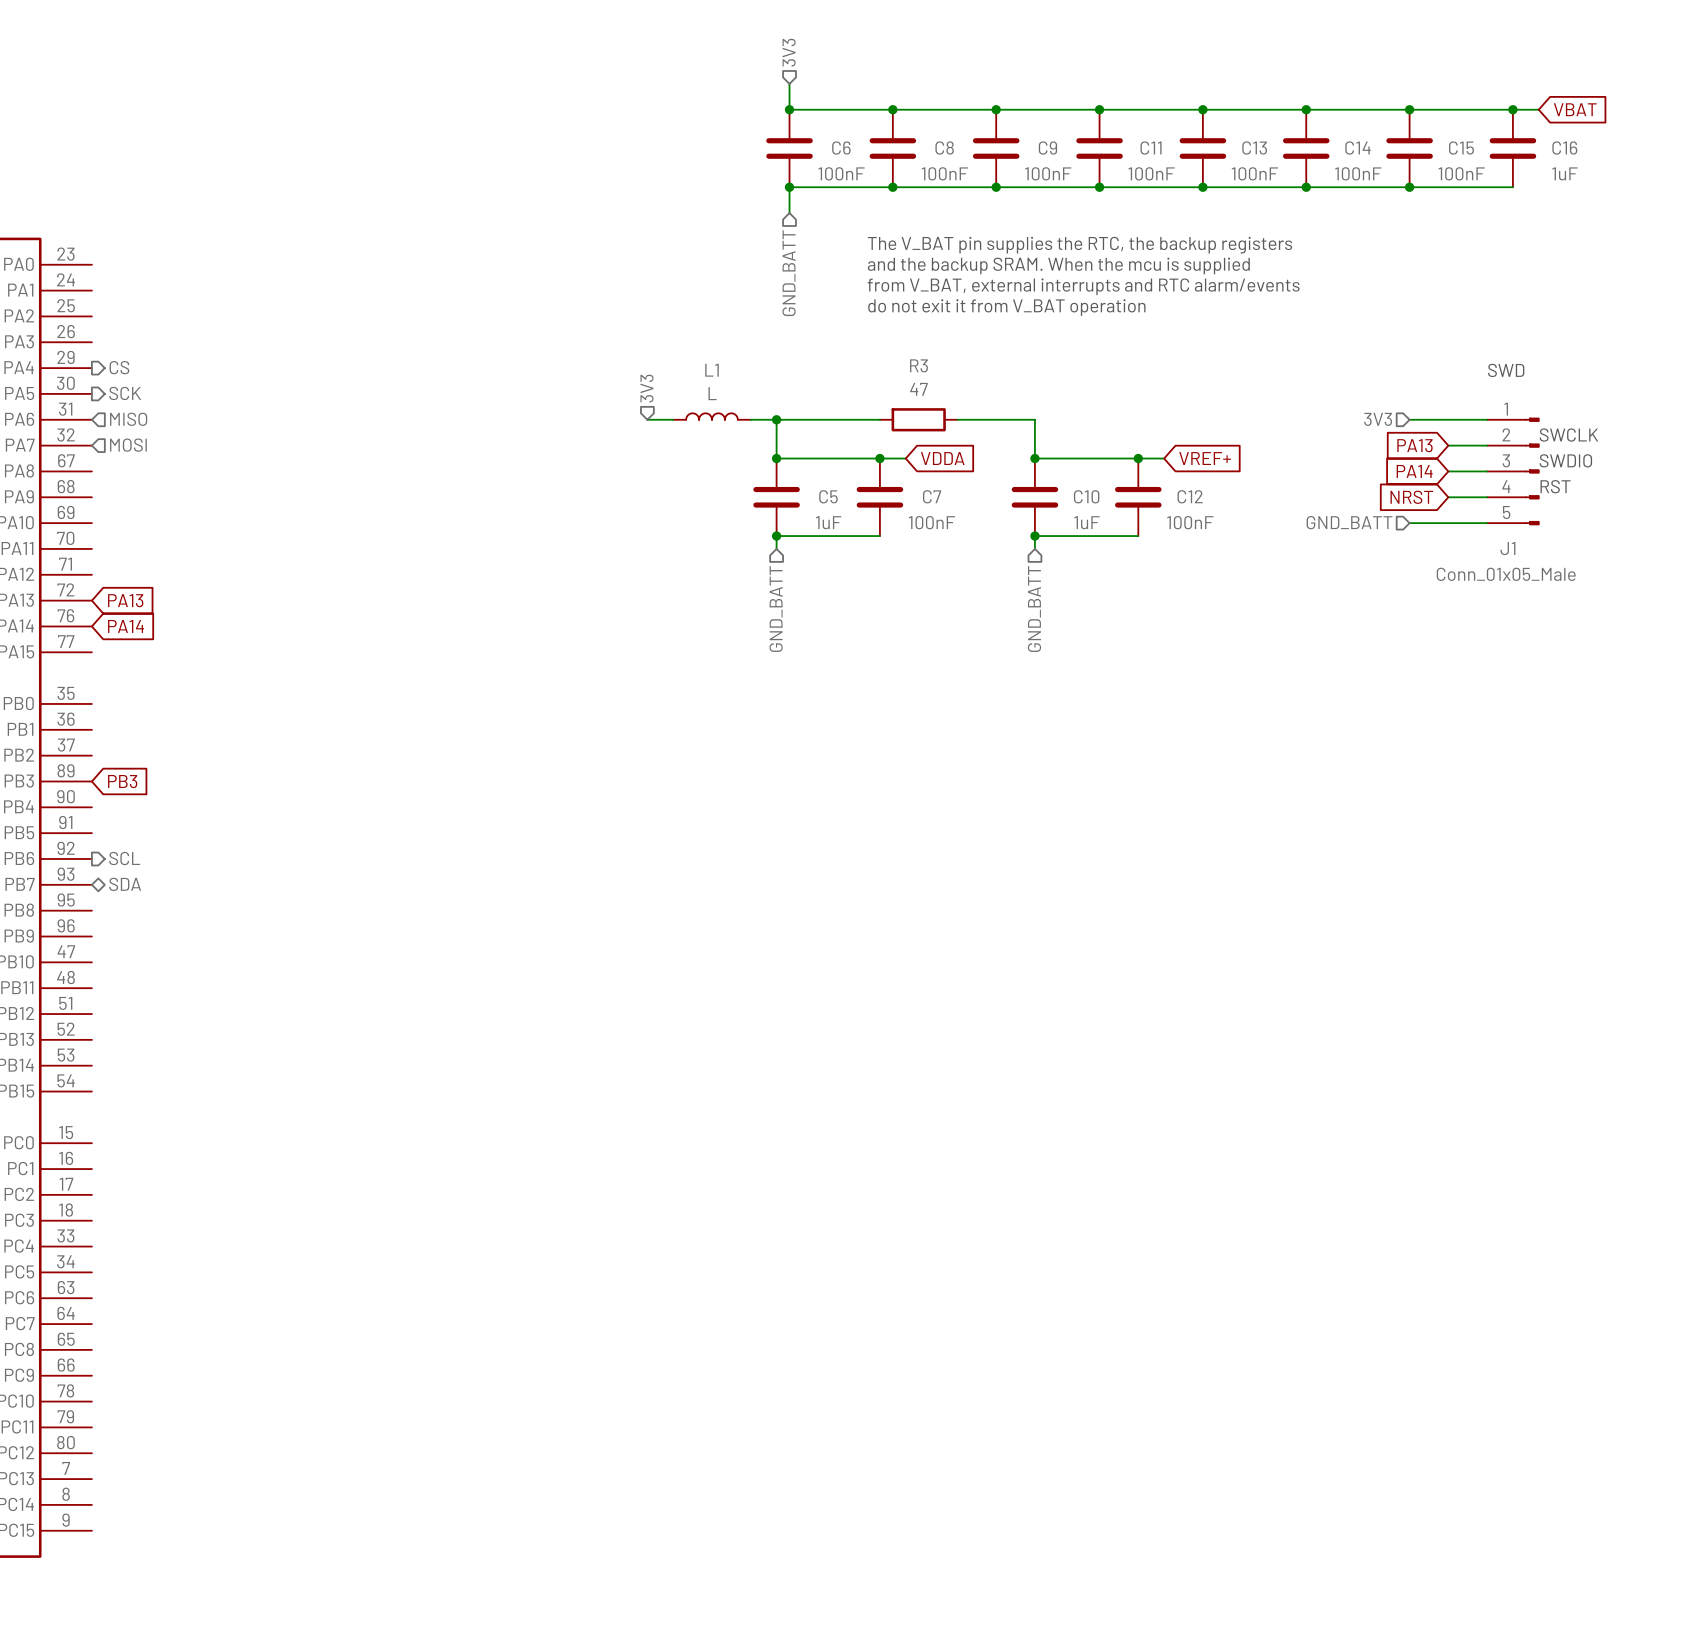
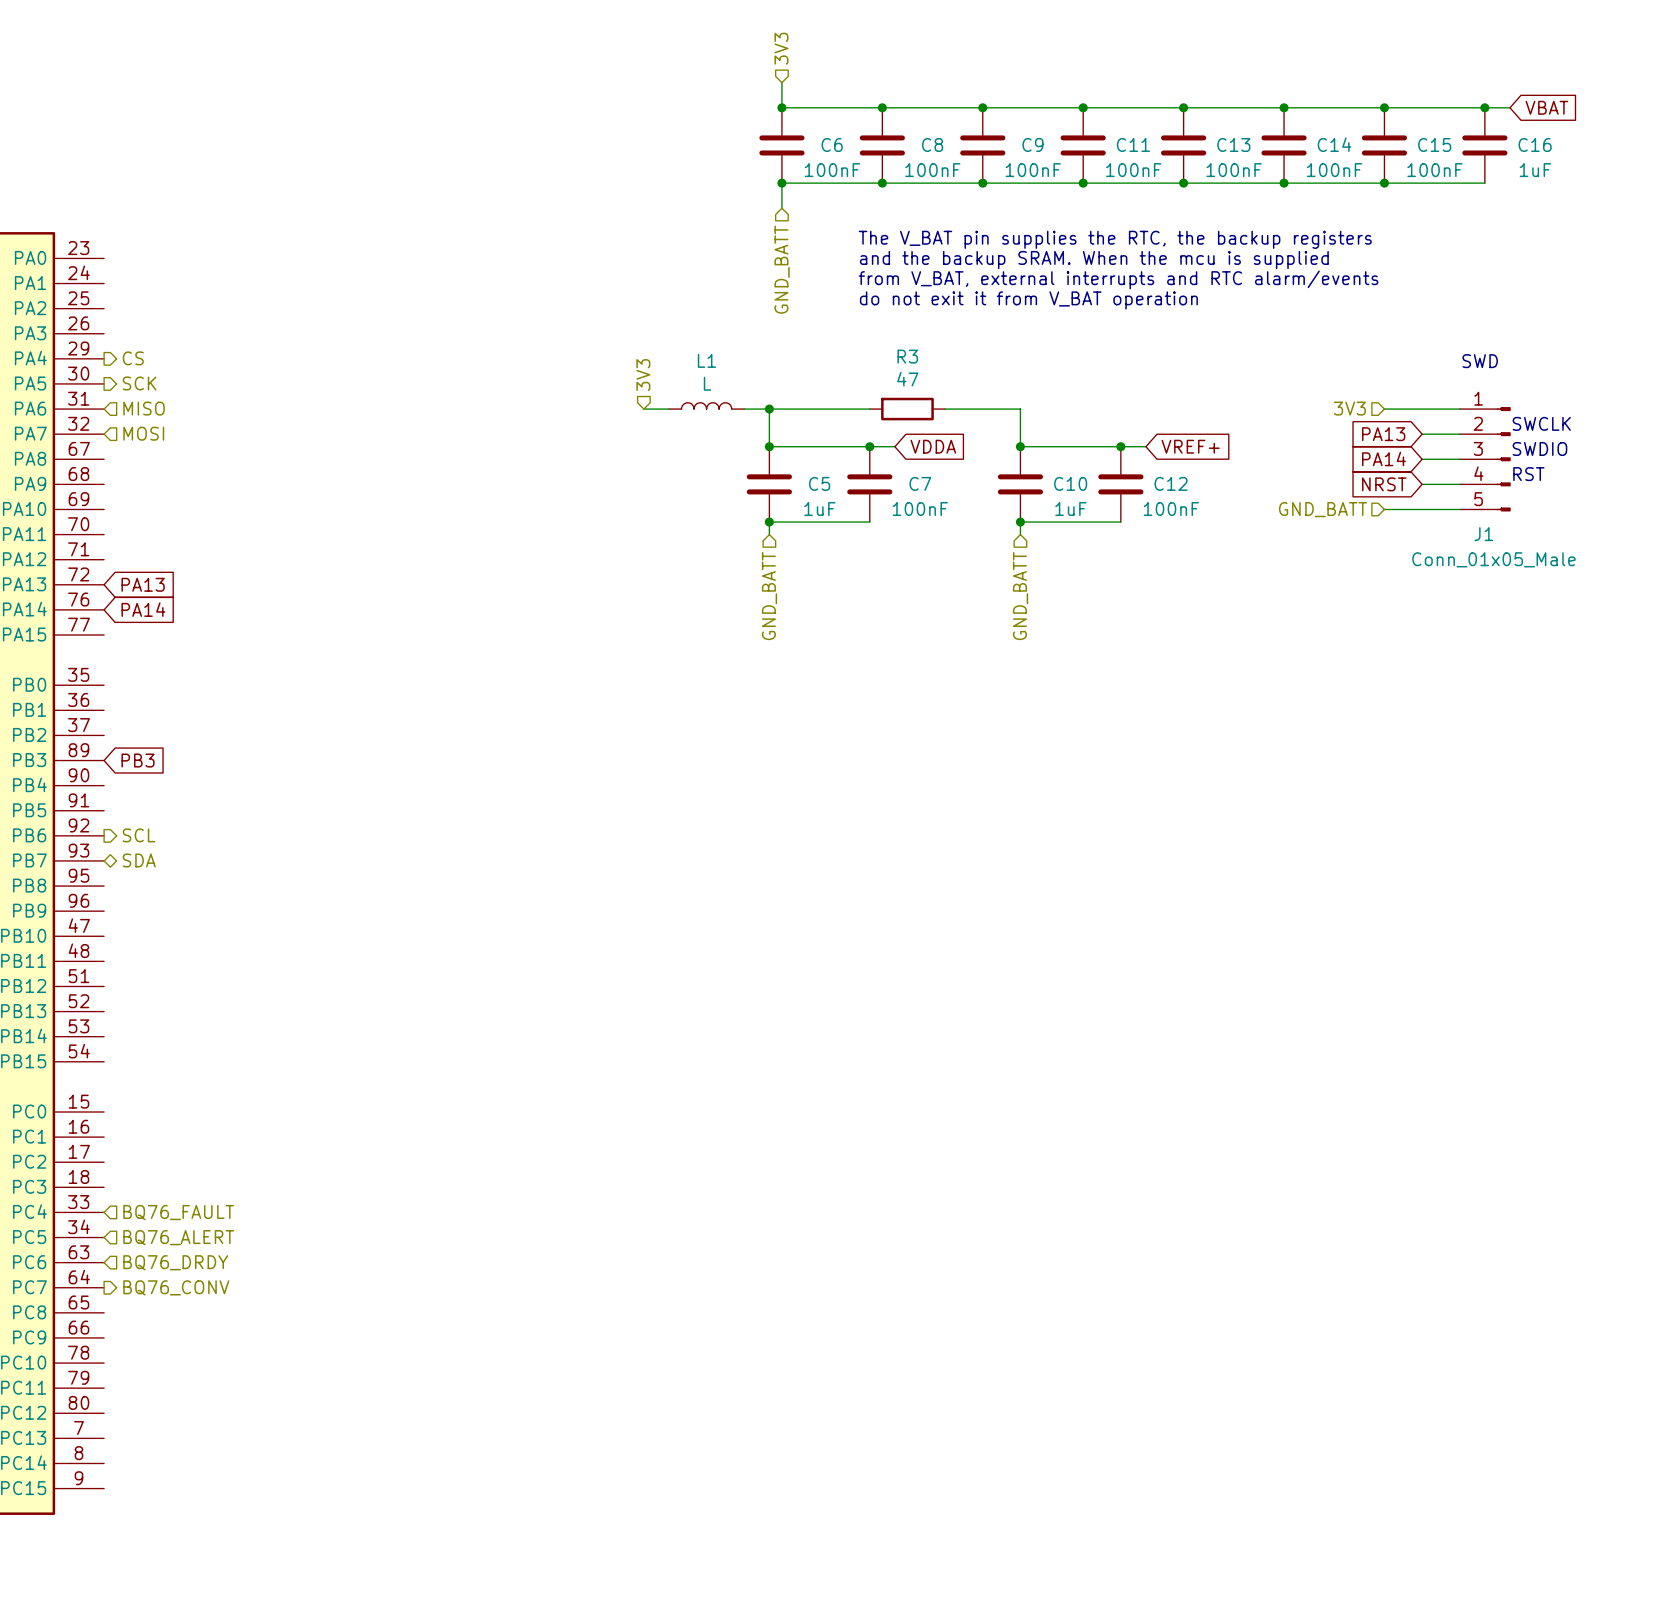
hierarchical label: none -> BQ76_FAULT (178, 1212)
hierarchical label: none -> BQ76_ALERT (178, 1237)
hierarchical label: none -> BQ76_DRDY (175, 1262)
hierarchical label: none -> BQ76_CONV (176, 1287)

